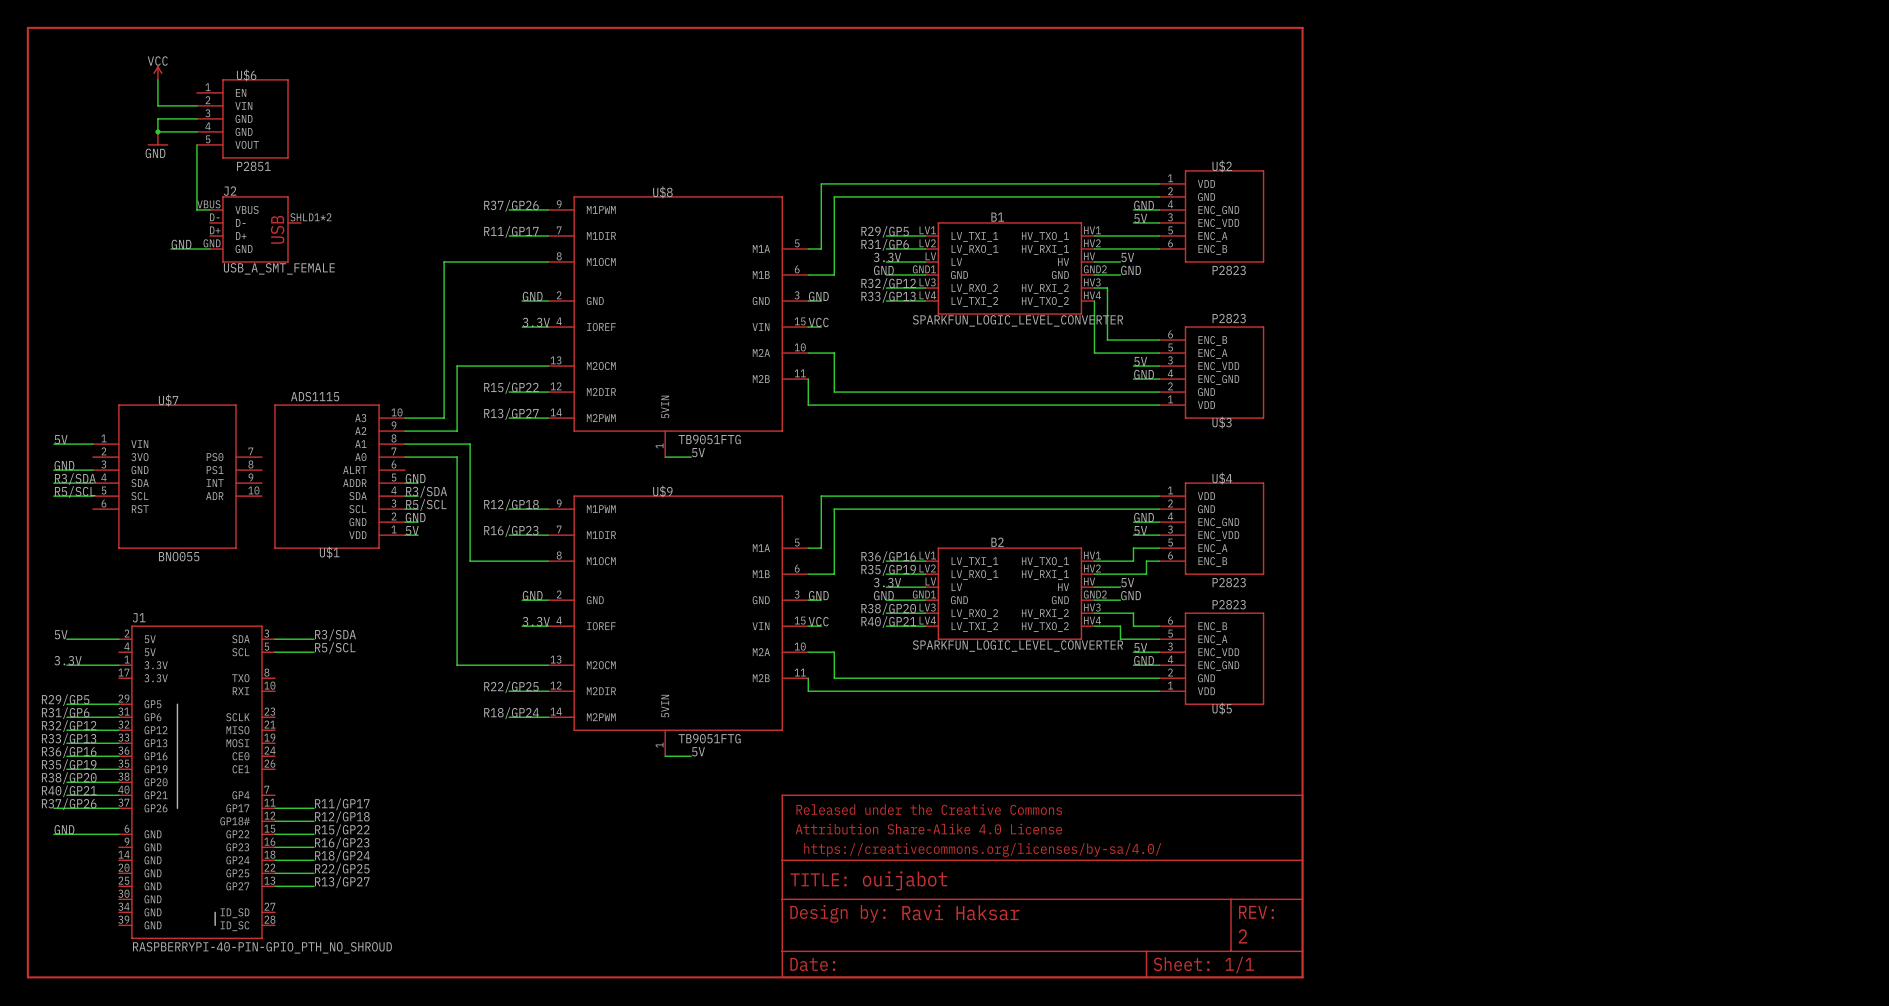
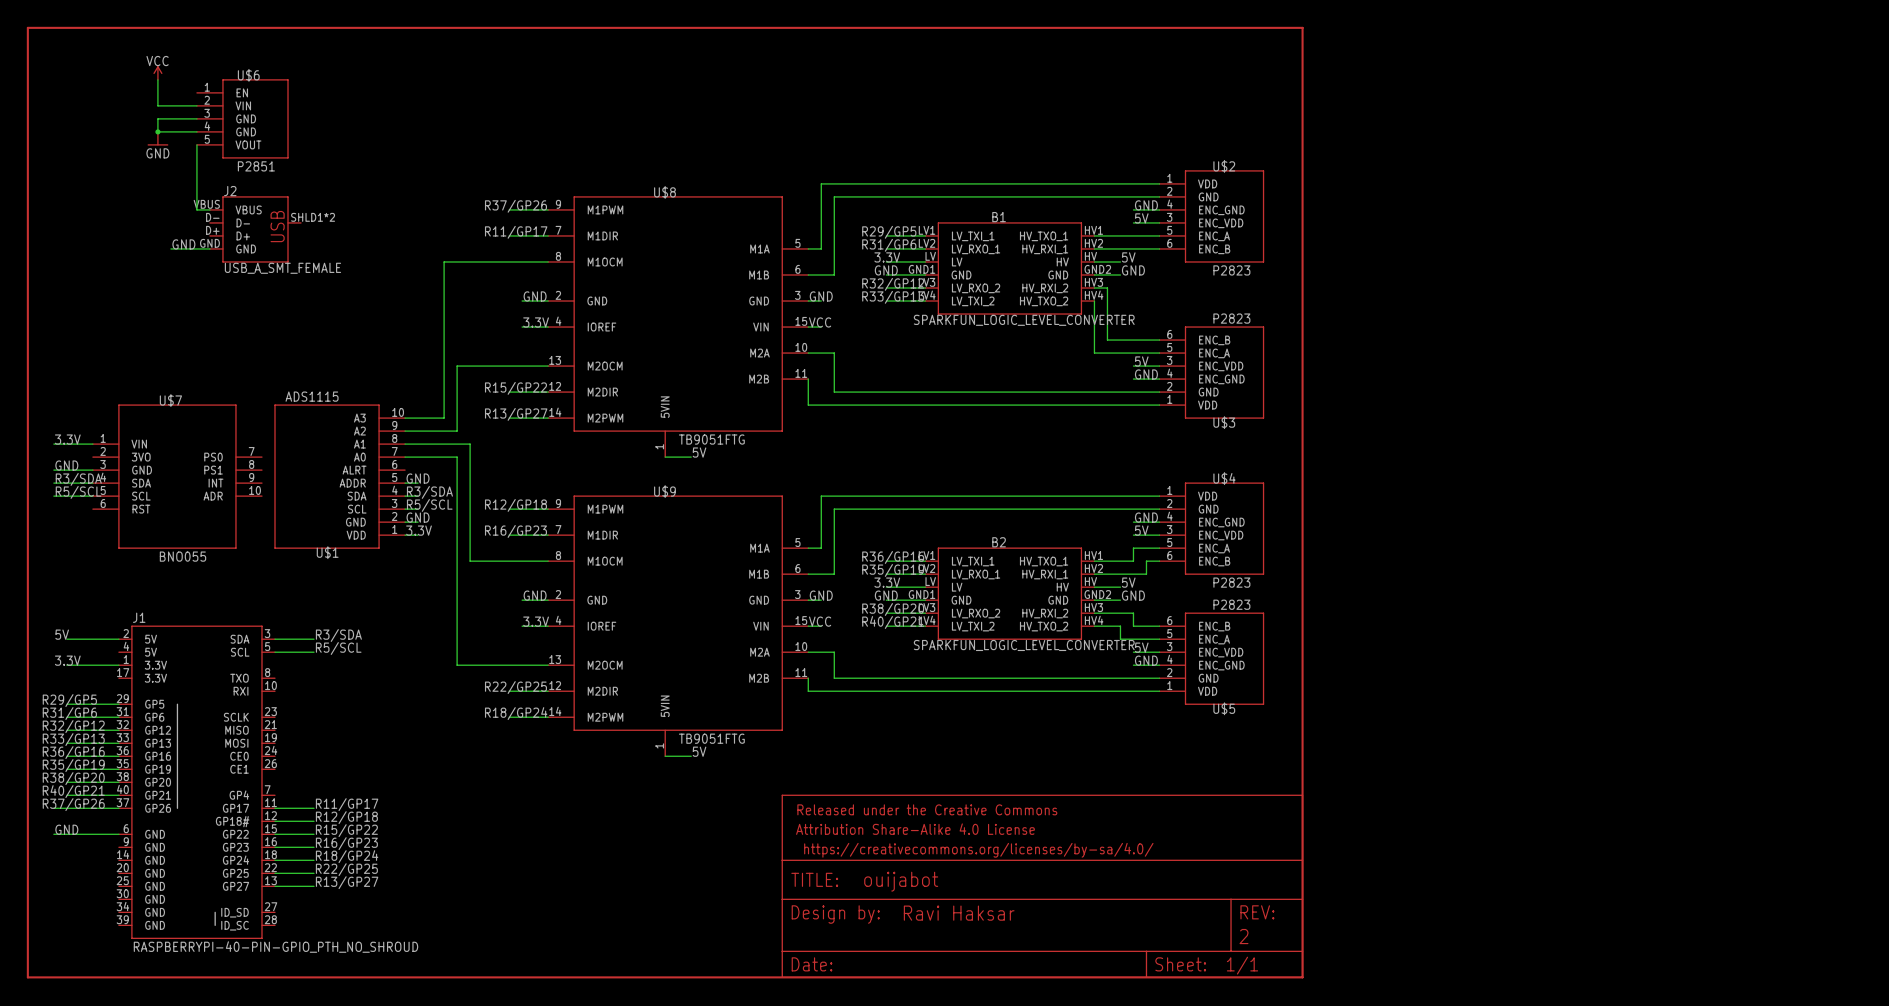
label: 5V (61, 439) -> 3.3V (67, 439)
label: 5V (412, 530) -> 3.3V (419, 530)

